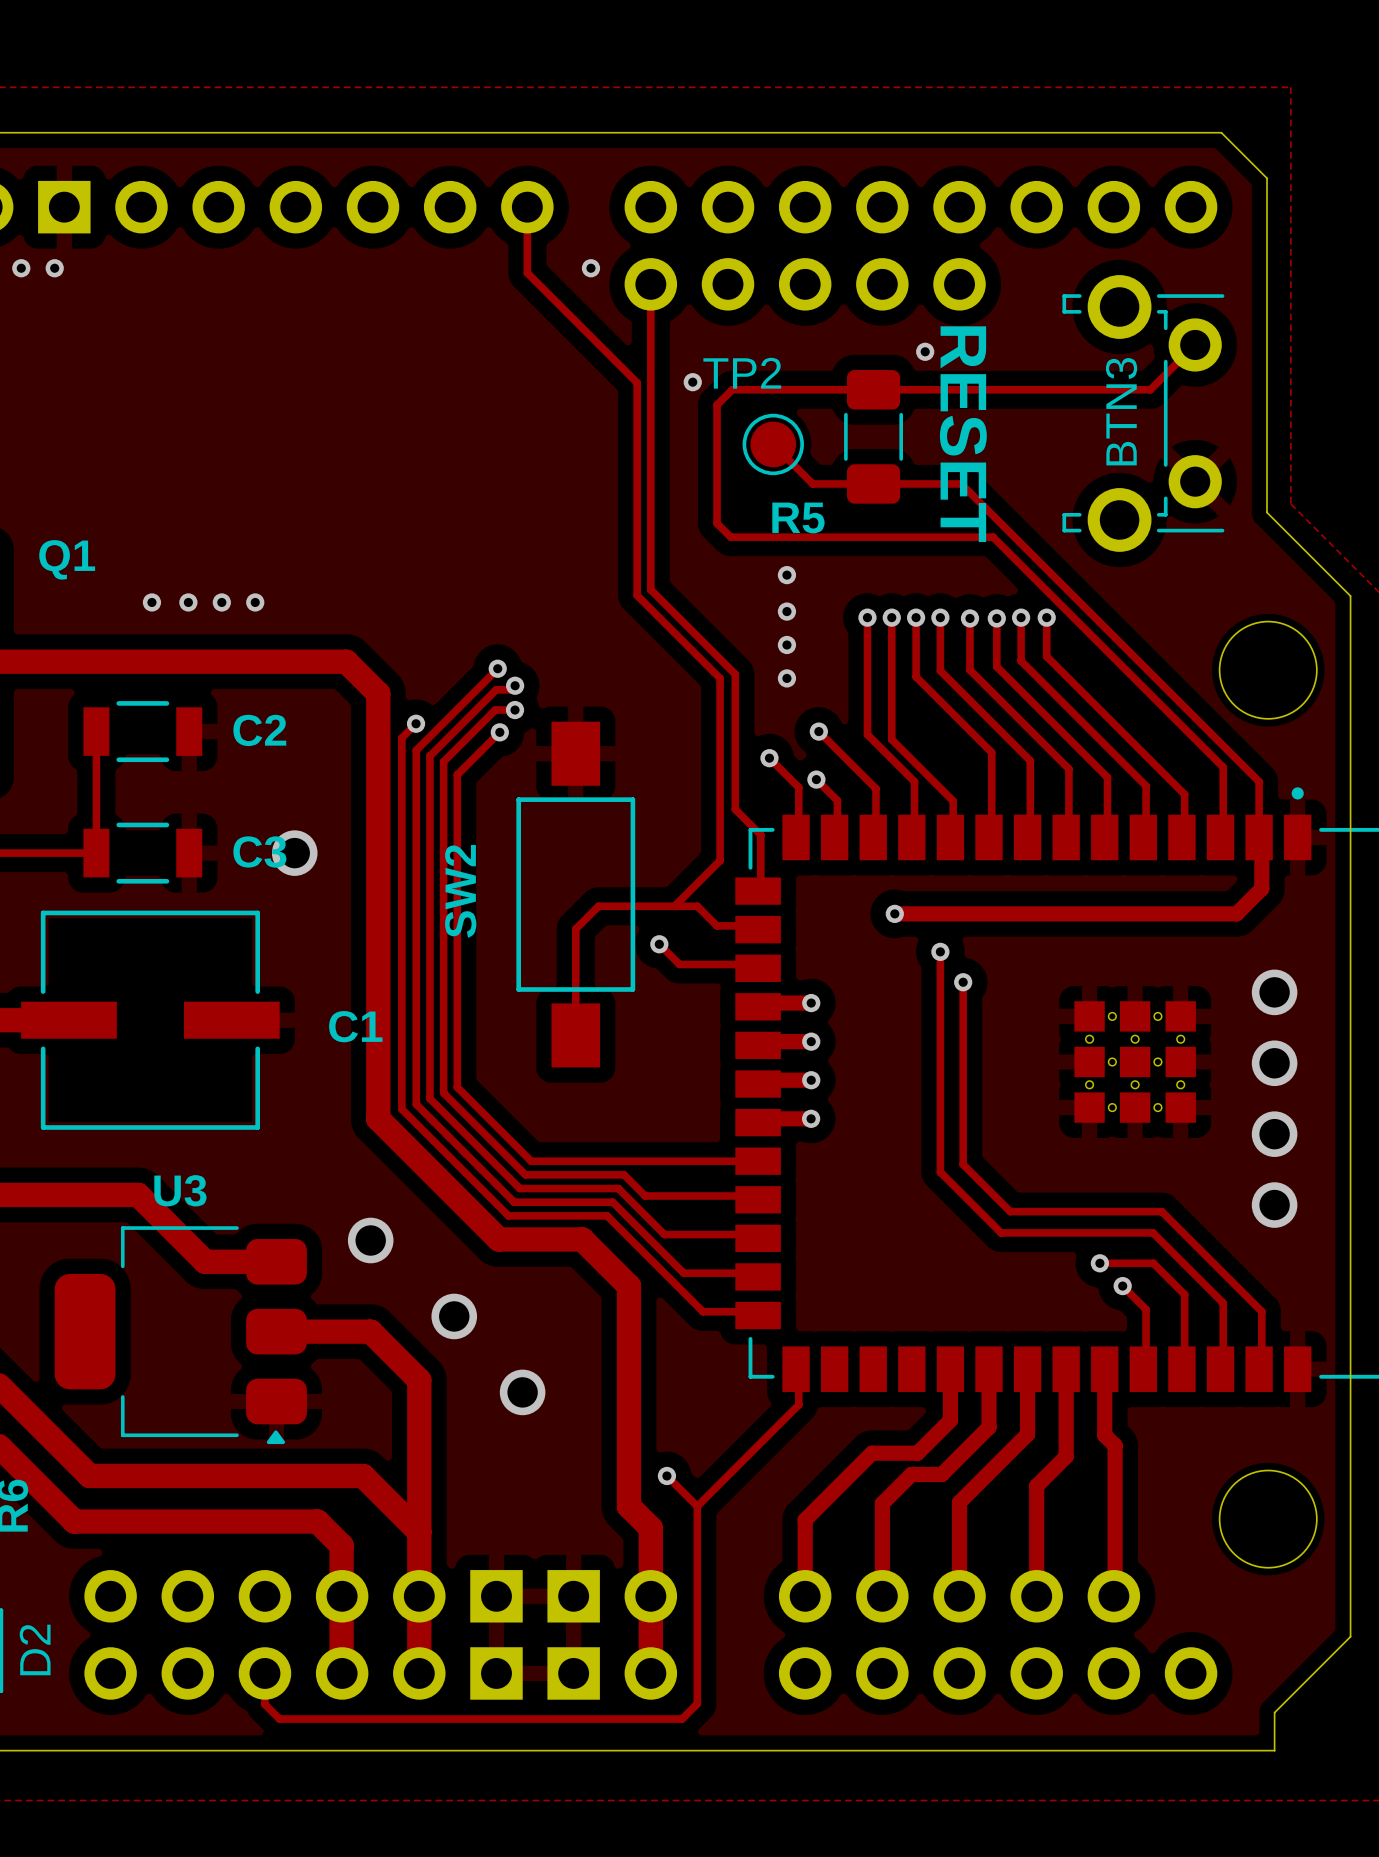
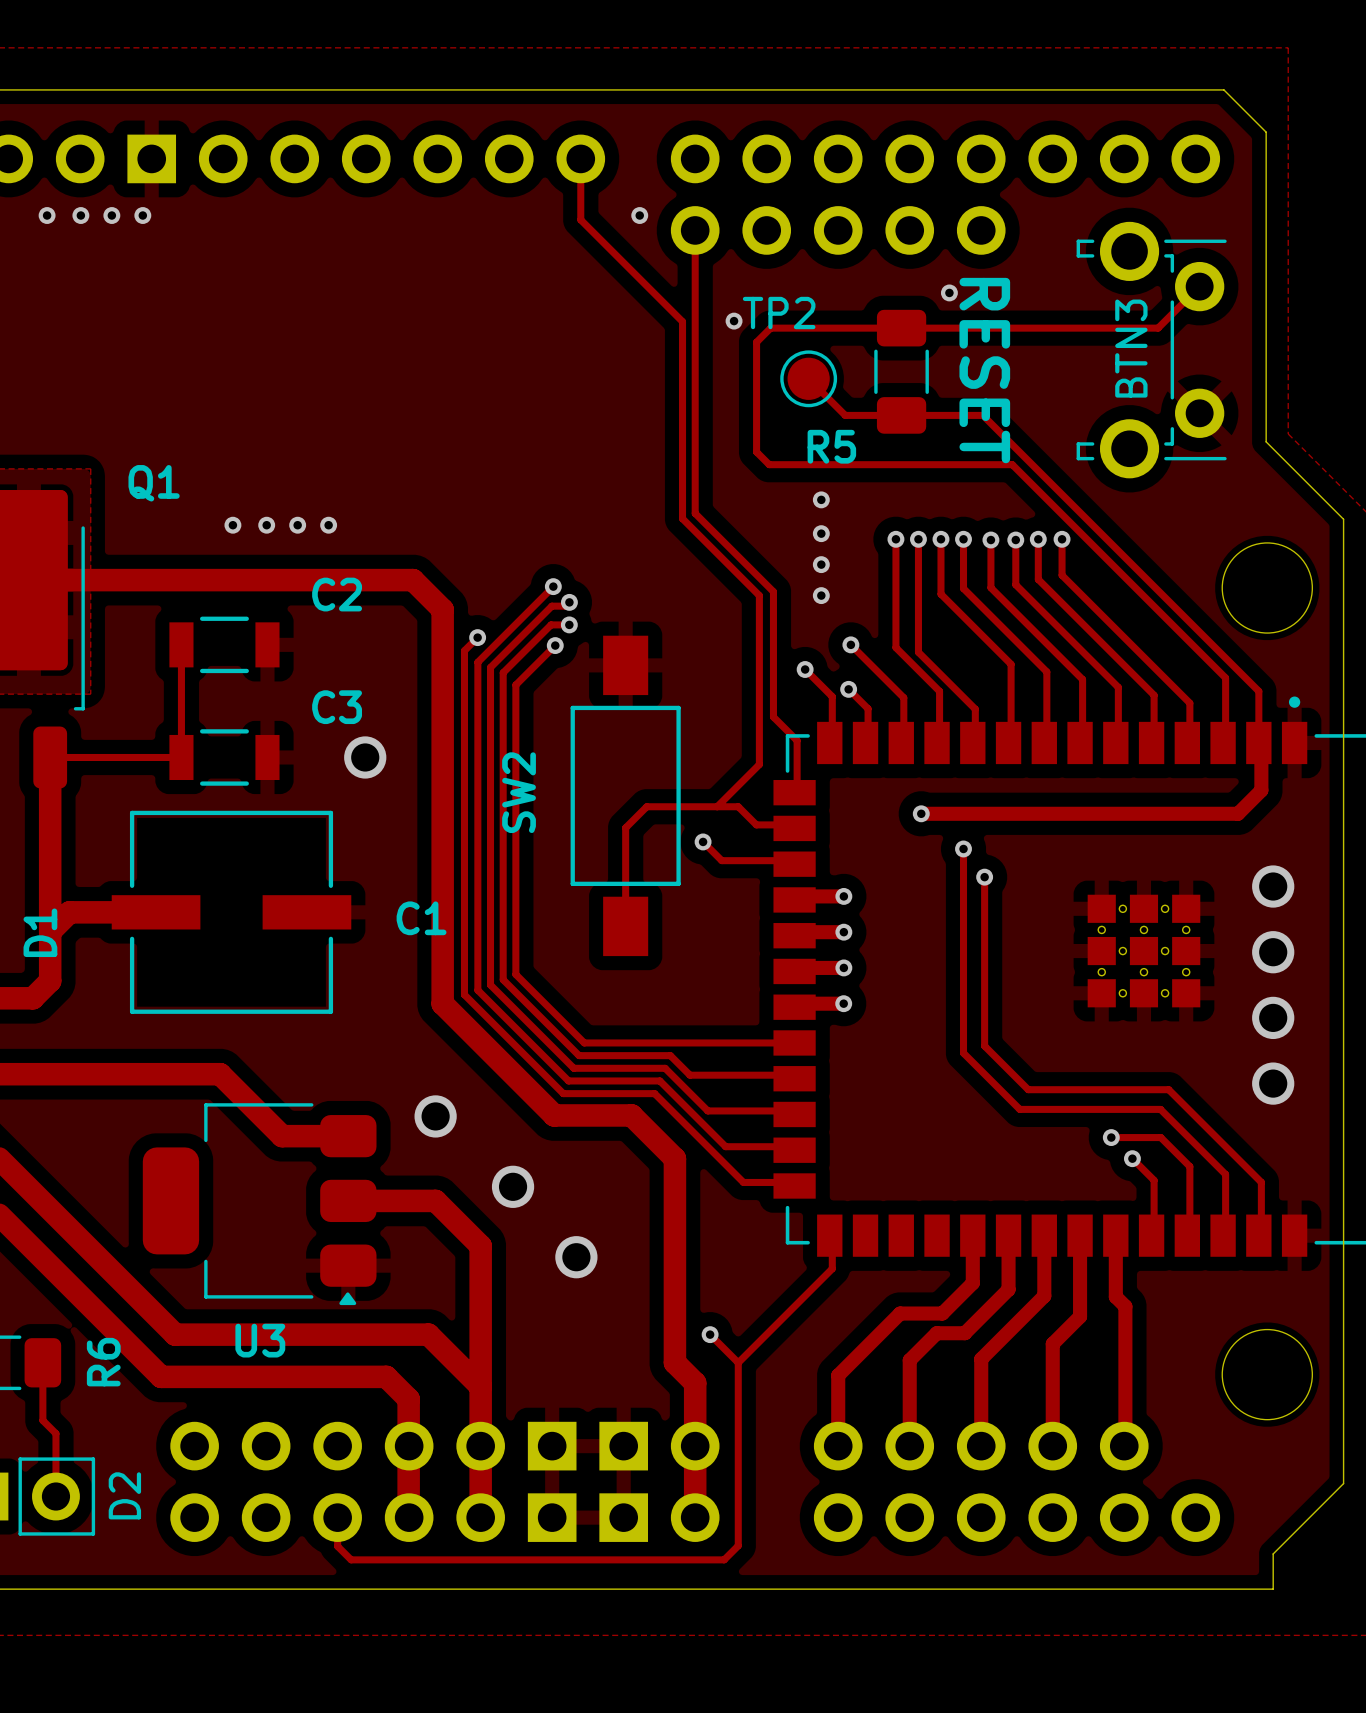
C2 name position: C2 (259, 730) -> C2 (337, 594)
C3 name position: C3 (259, 852) -> C3 (337, 707)
U3 name position: U3 (180, 1190) -> U3 (260, 1340)

